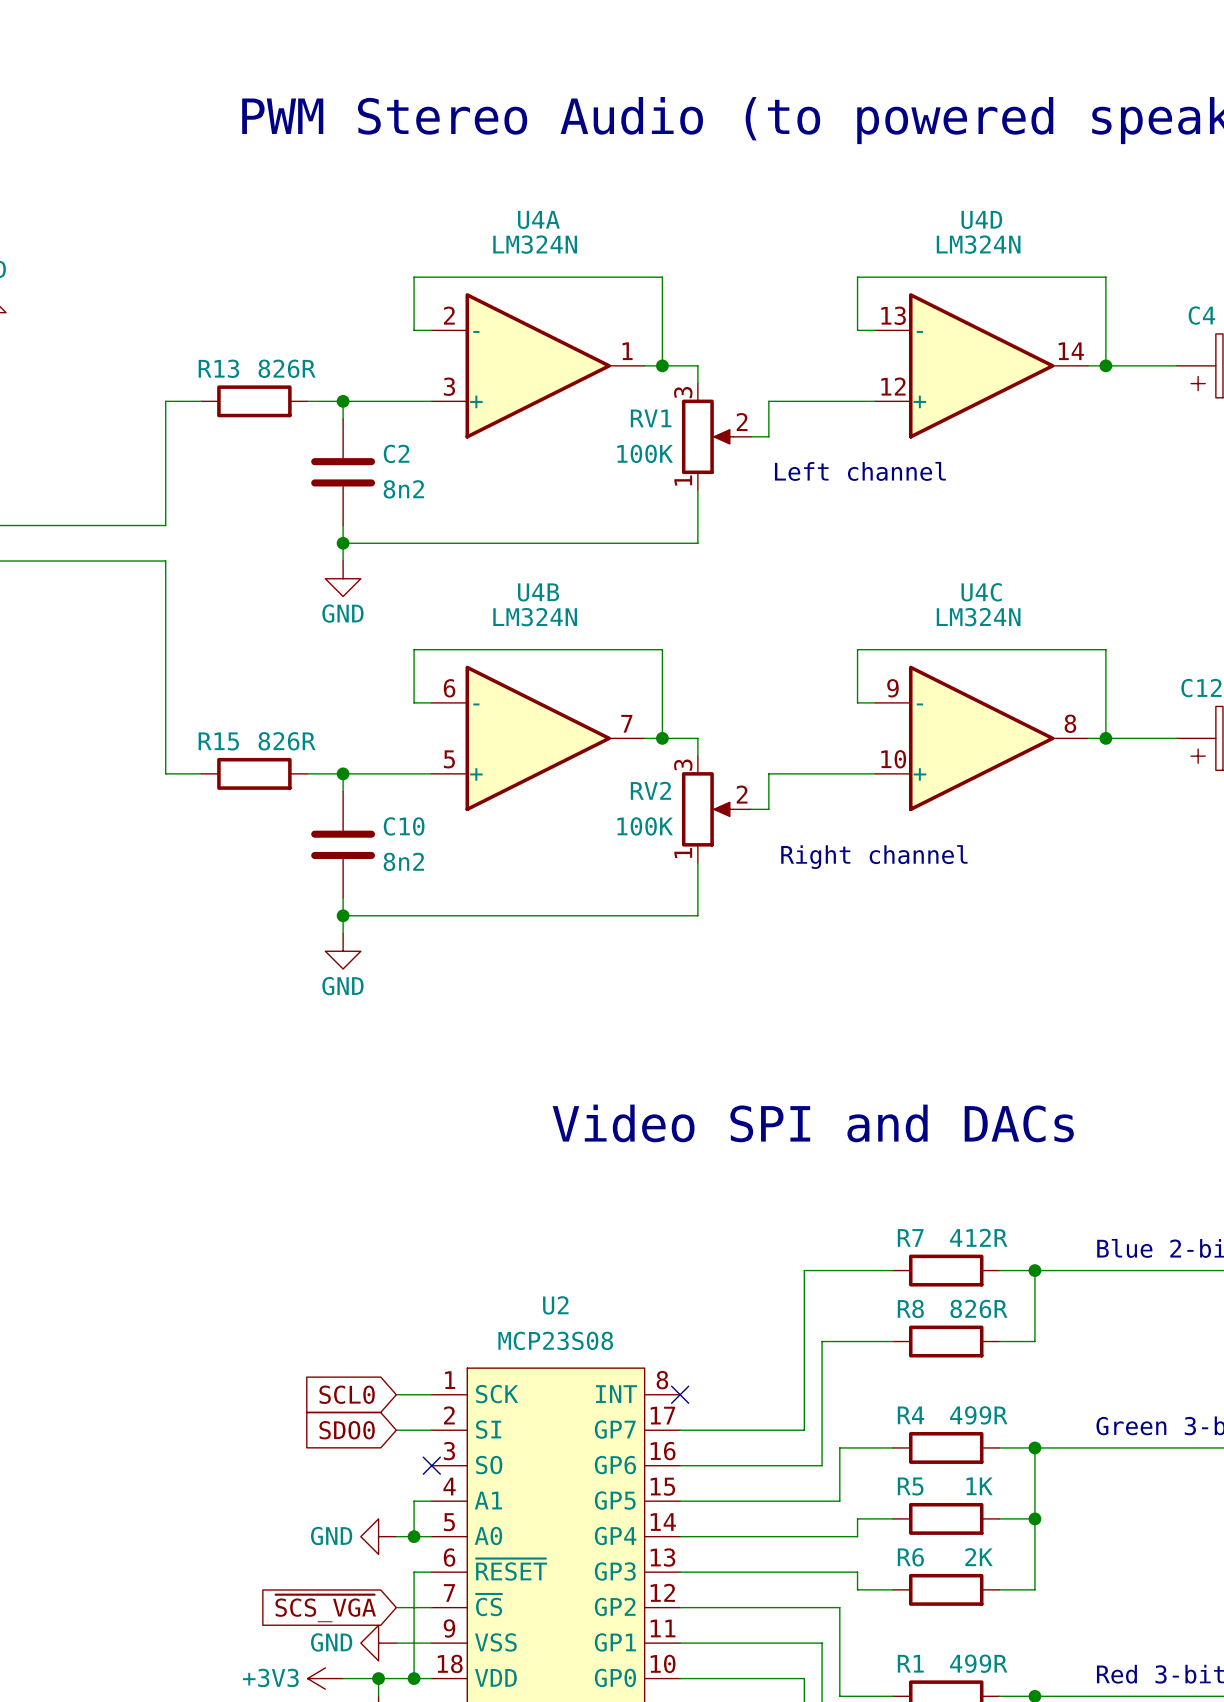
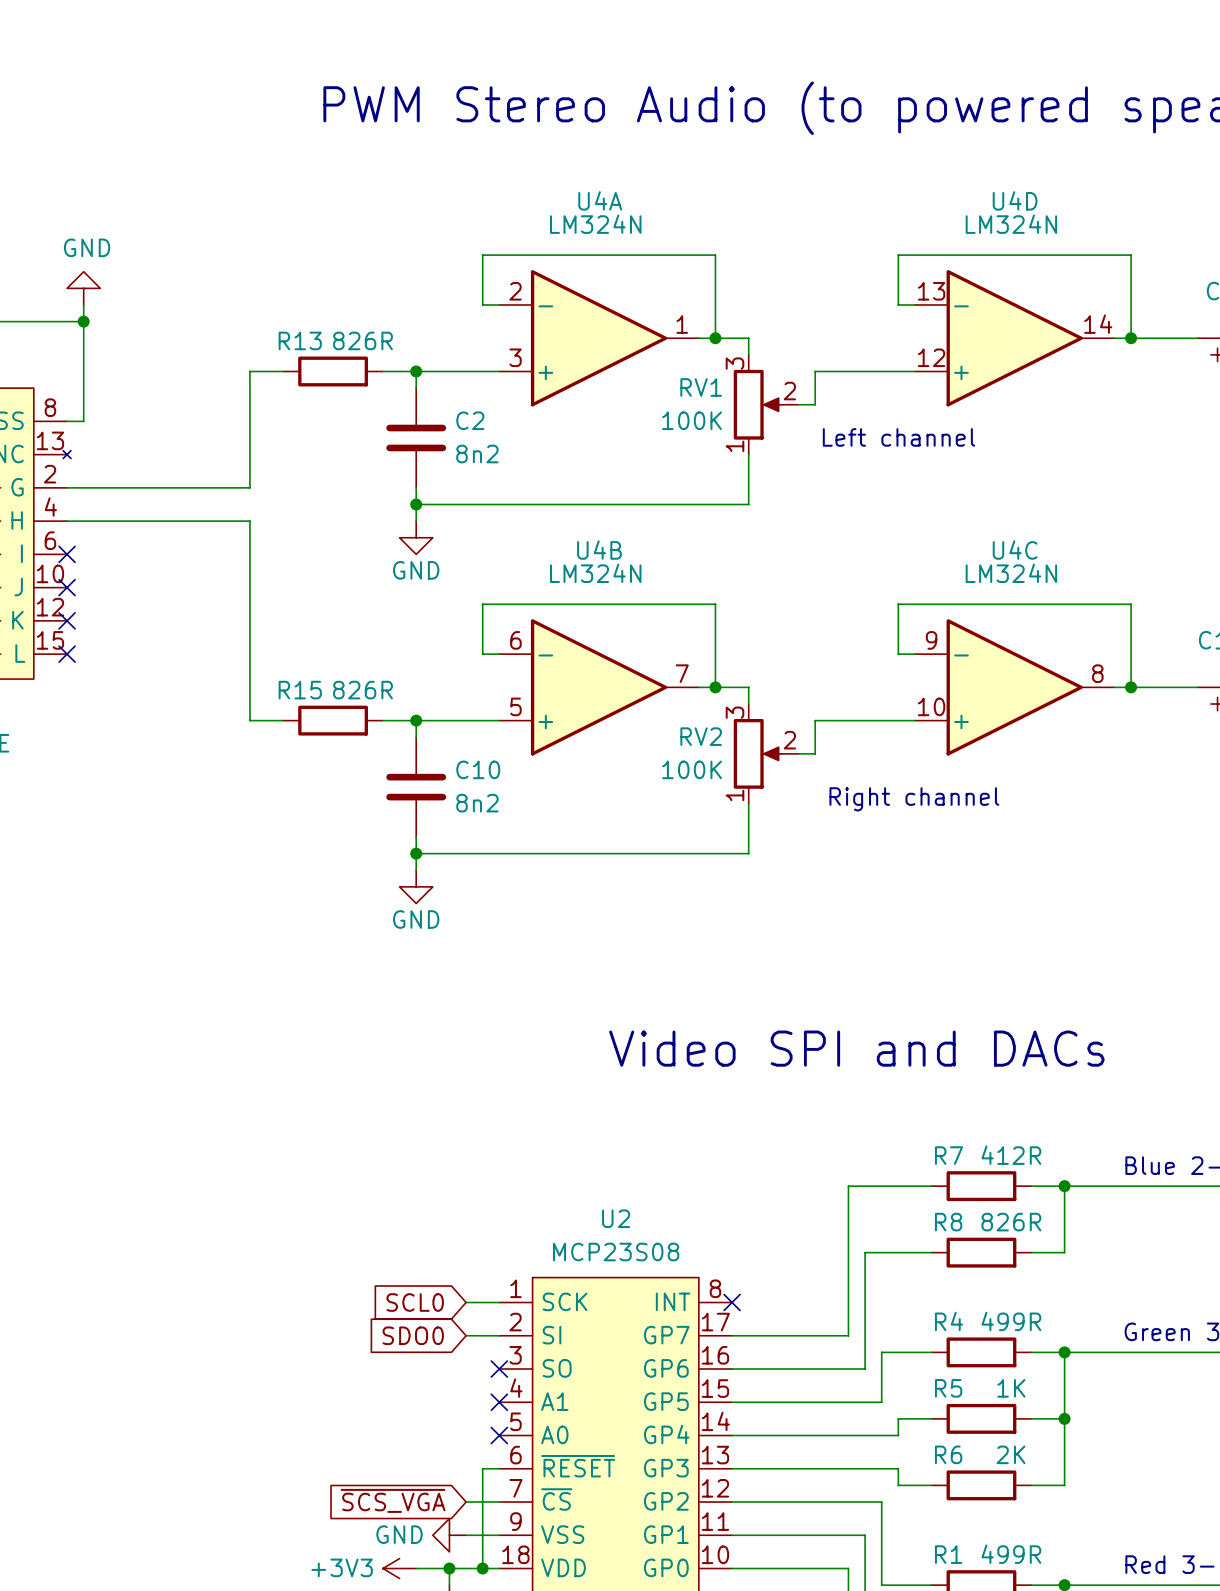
wire: (431, 1501) (414, 1501) (414, 1536) -> none
no-connect mark: none -> (499, 1402)
power symbol: GND (378, 1536) -> none
wire: (396, 1536) (431, 1536) -> none
junction: (414, 1536) -> none
no-connect mark: none -> (499, 1435)

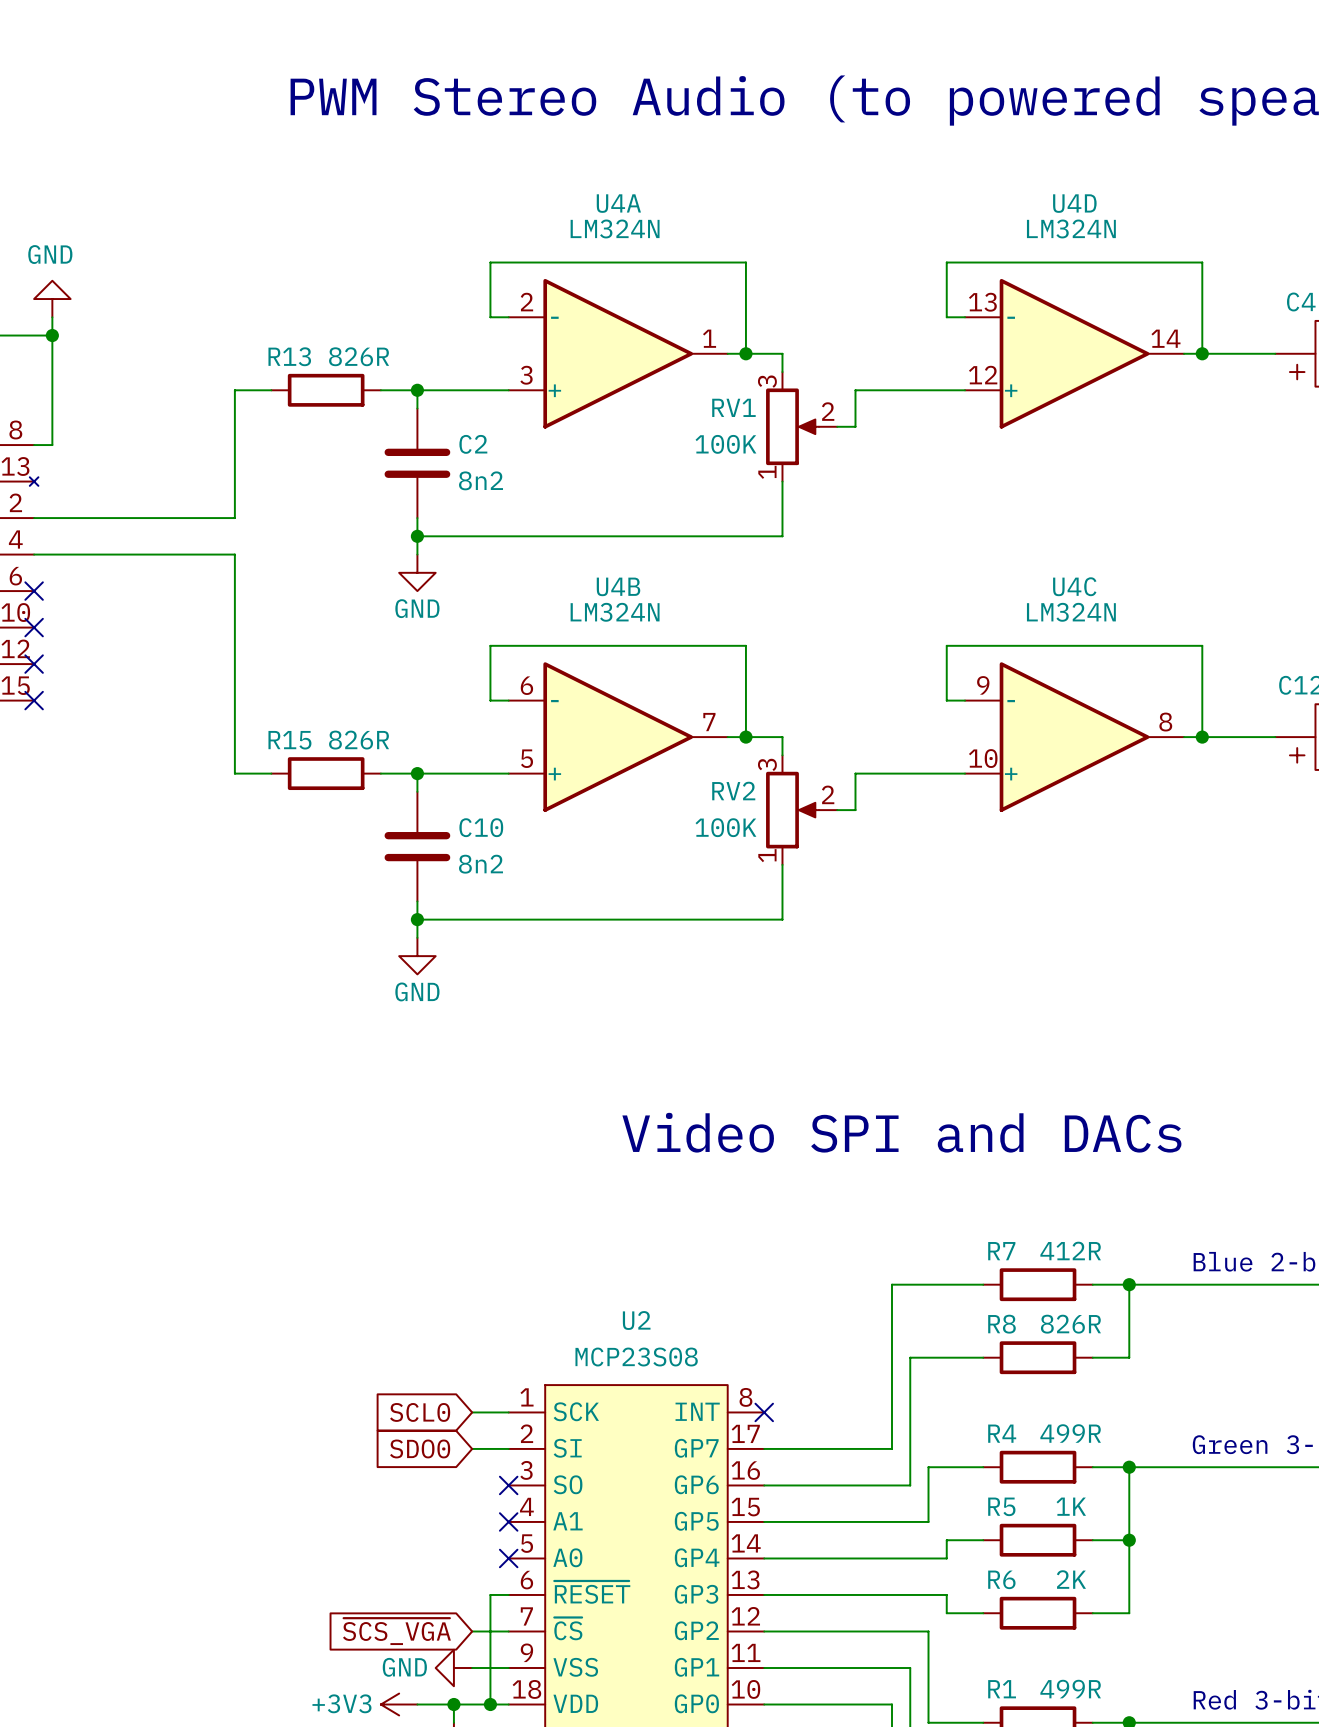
text: Left channel (899, 437) -> none
text: Right channel (914, 799) -> none

